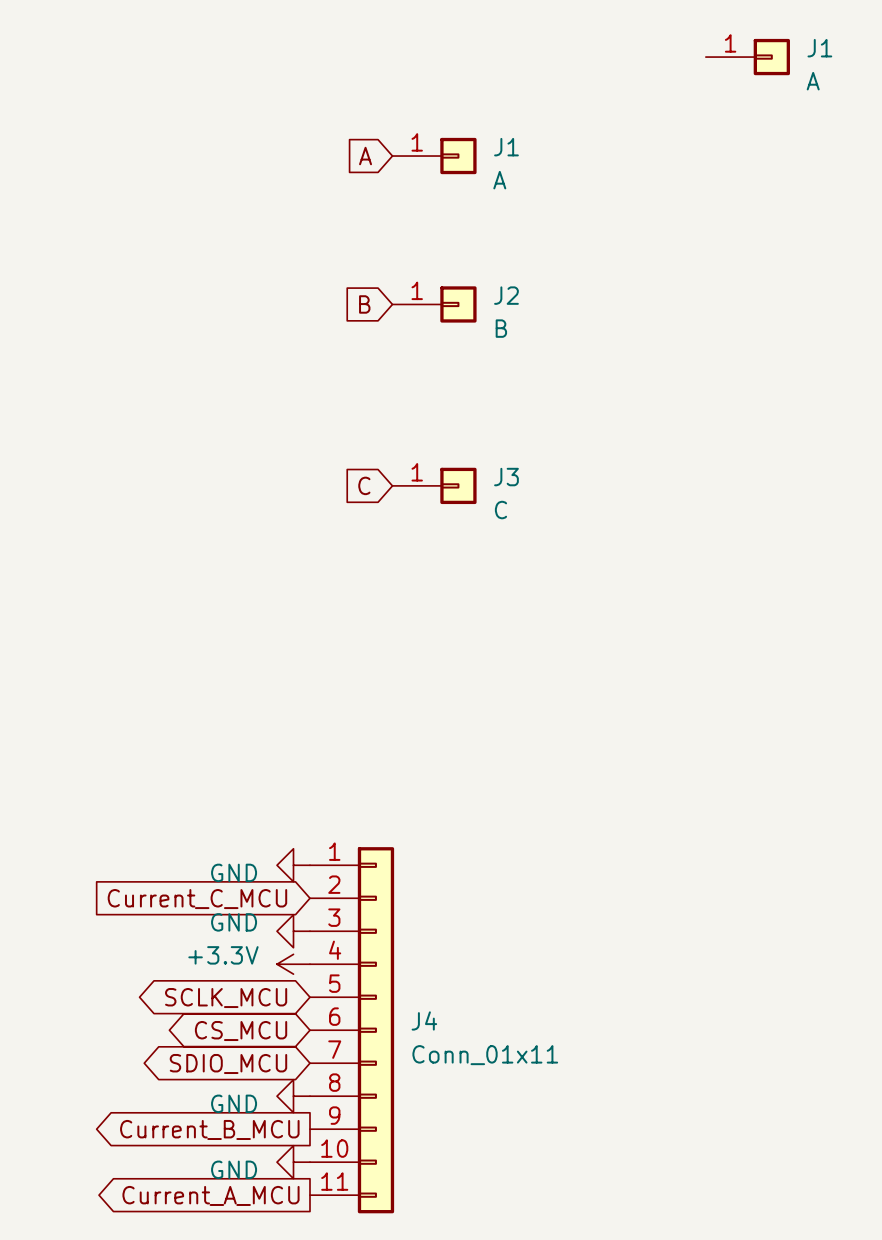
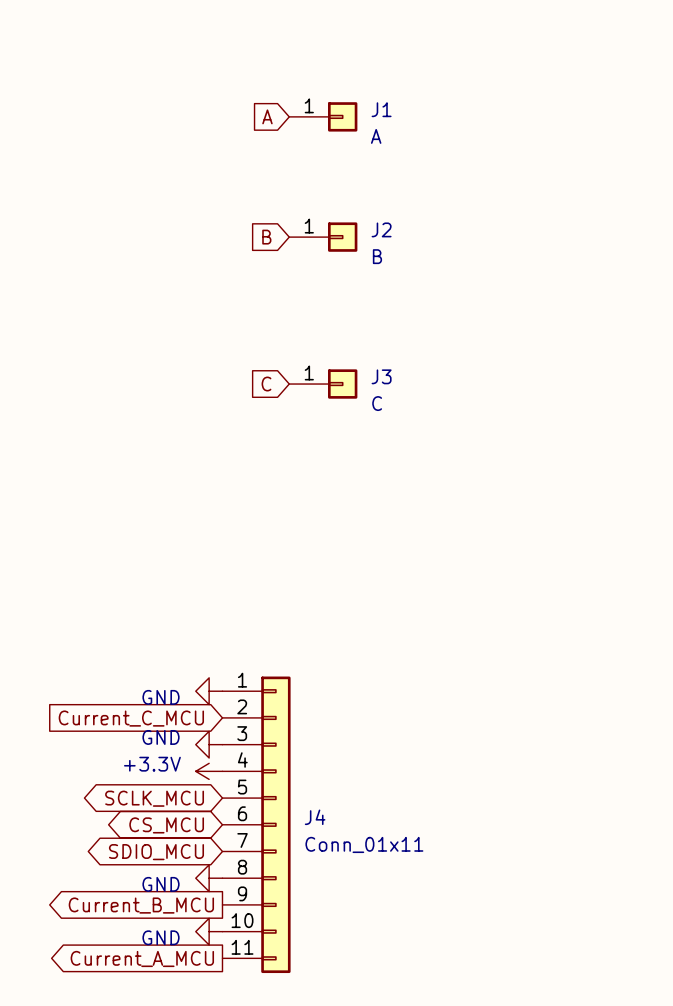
J1: A (747, 57) -> none

